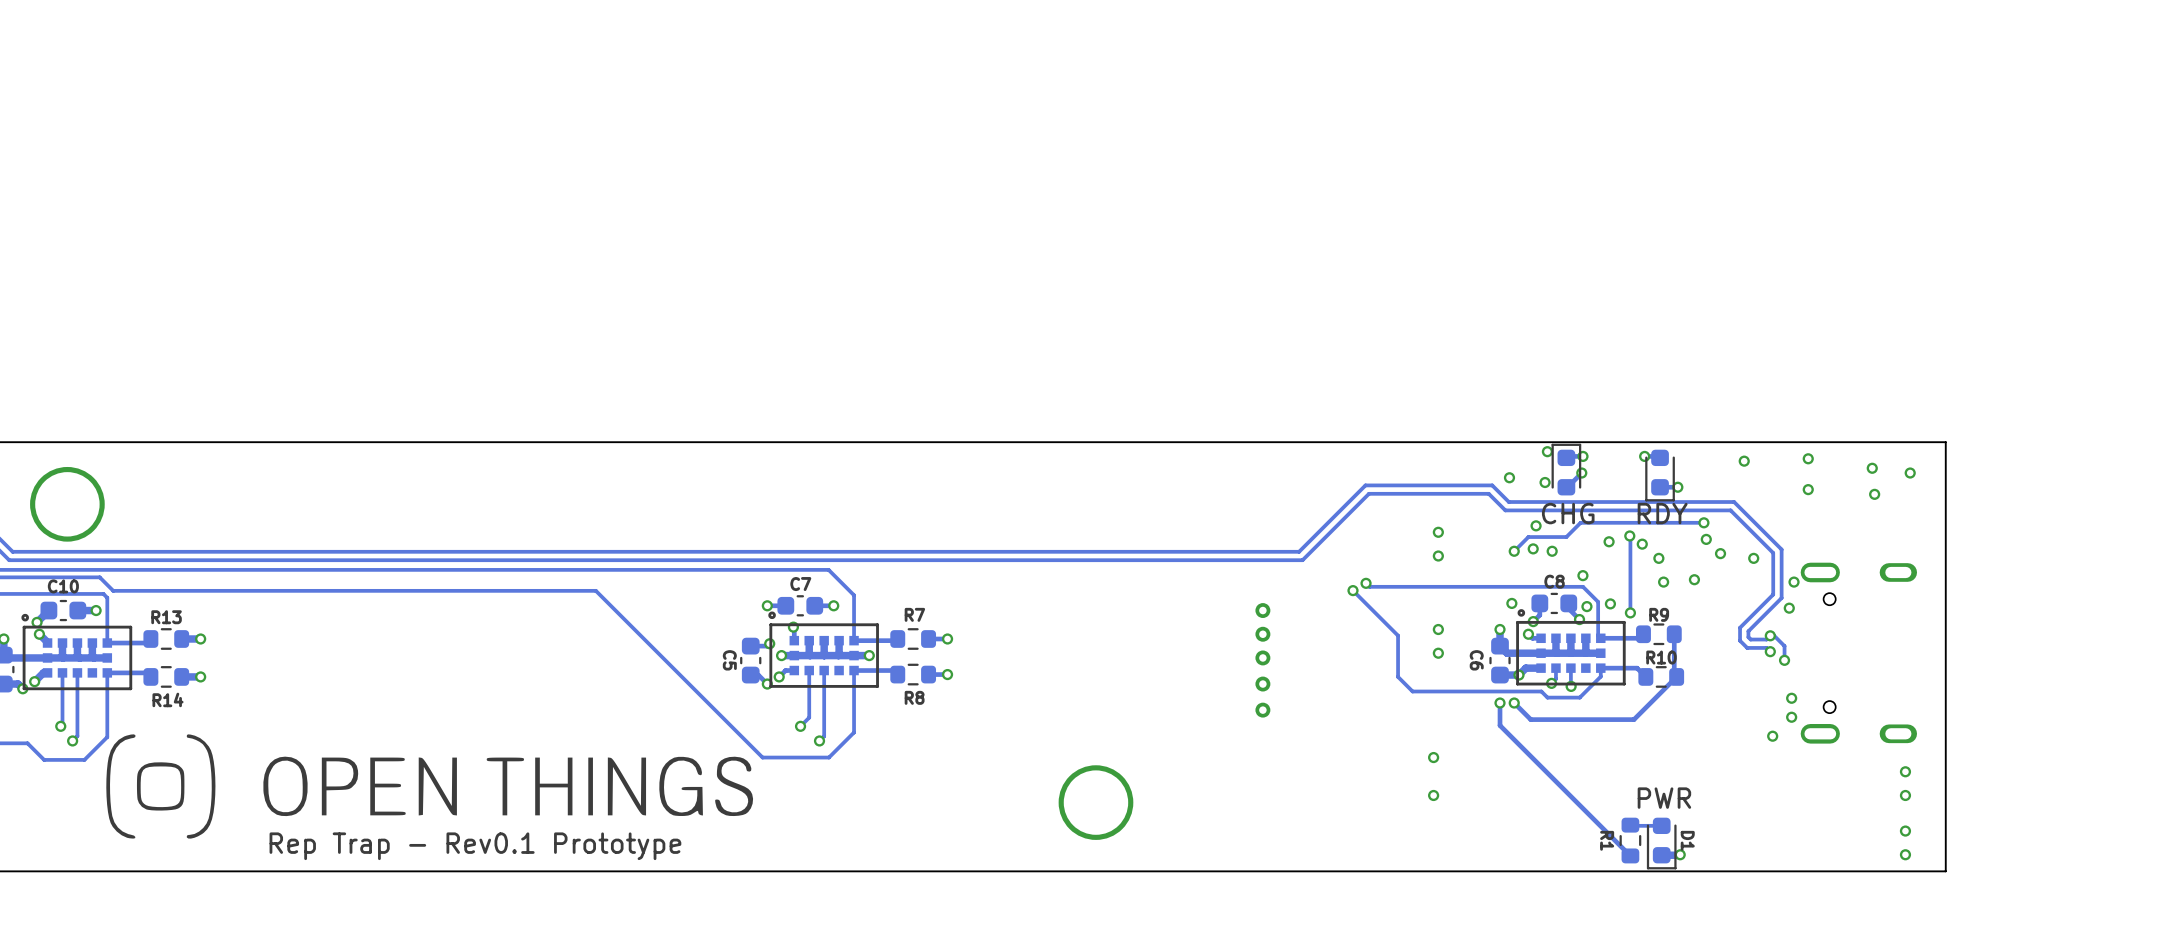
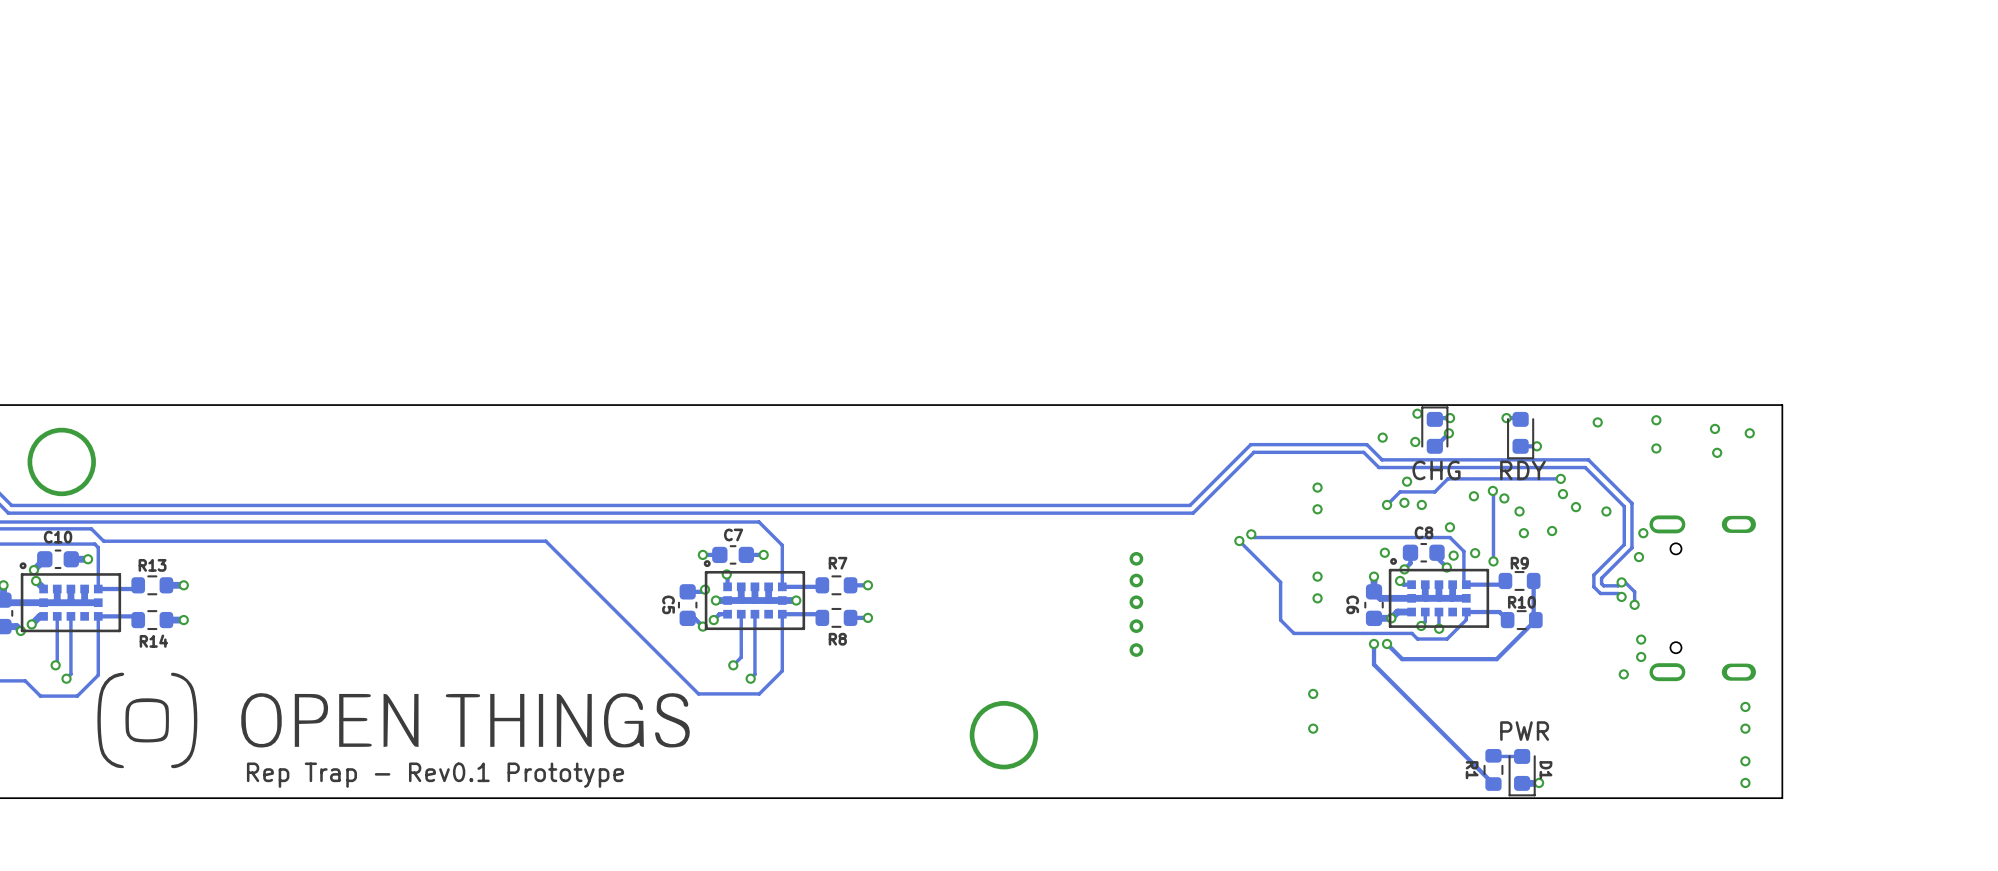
via: none -> (1136, 558)
via: (1262, 610) -> none
via: none -> (1136, 580)
via: (1262, 634) -> none
via: none -> (1136, 602)
via: (1262, 657) -> none
via: none -> (1136, 626)
via: (1262, 684) -> none
via: none -> (1136, 650)
via: (1262, 710) -> none

